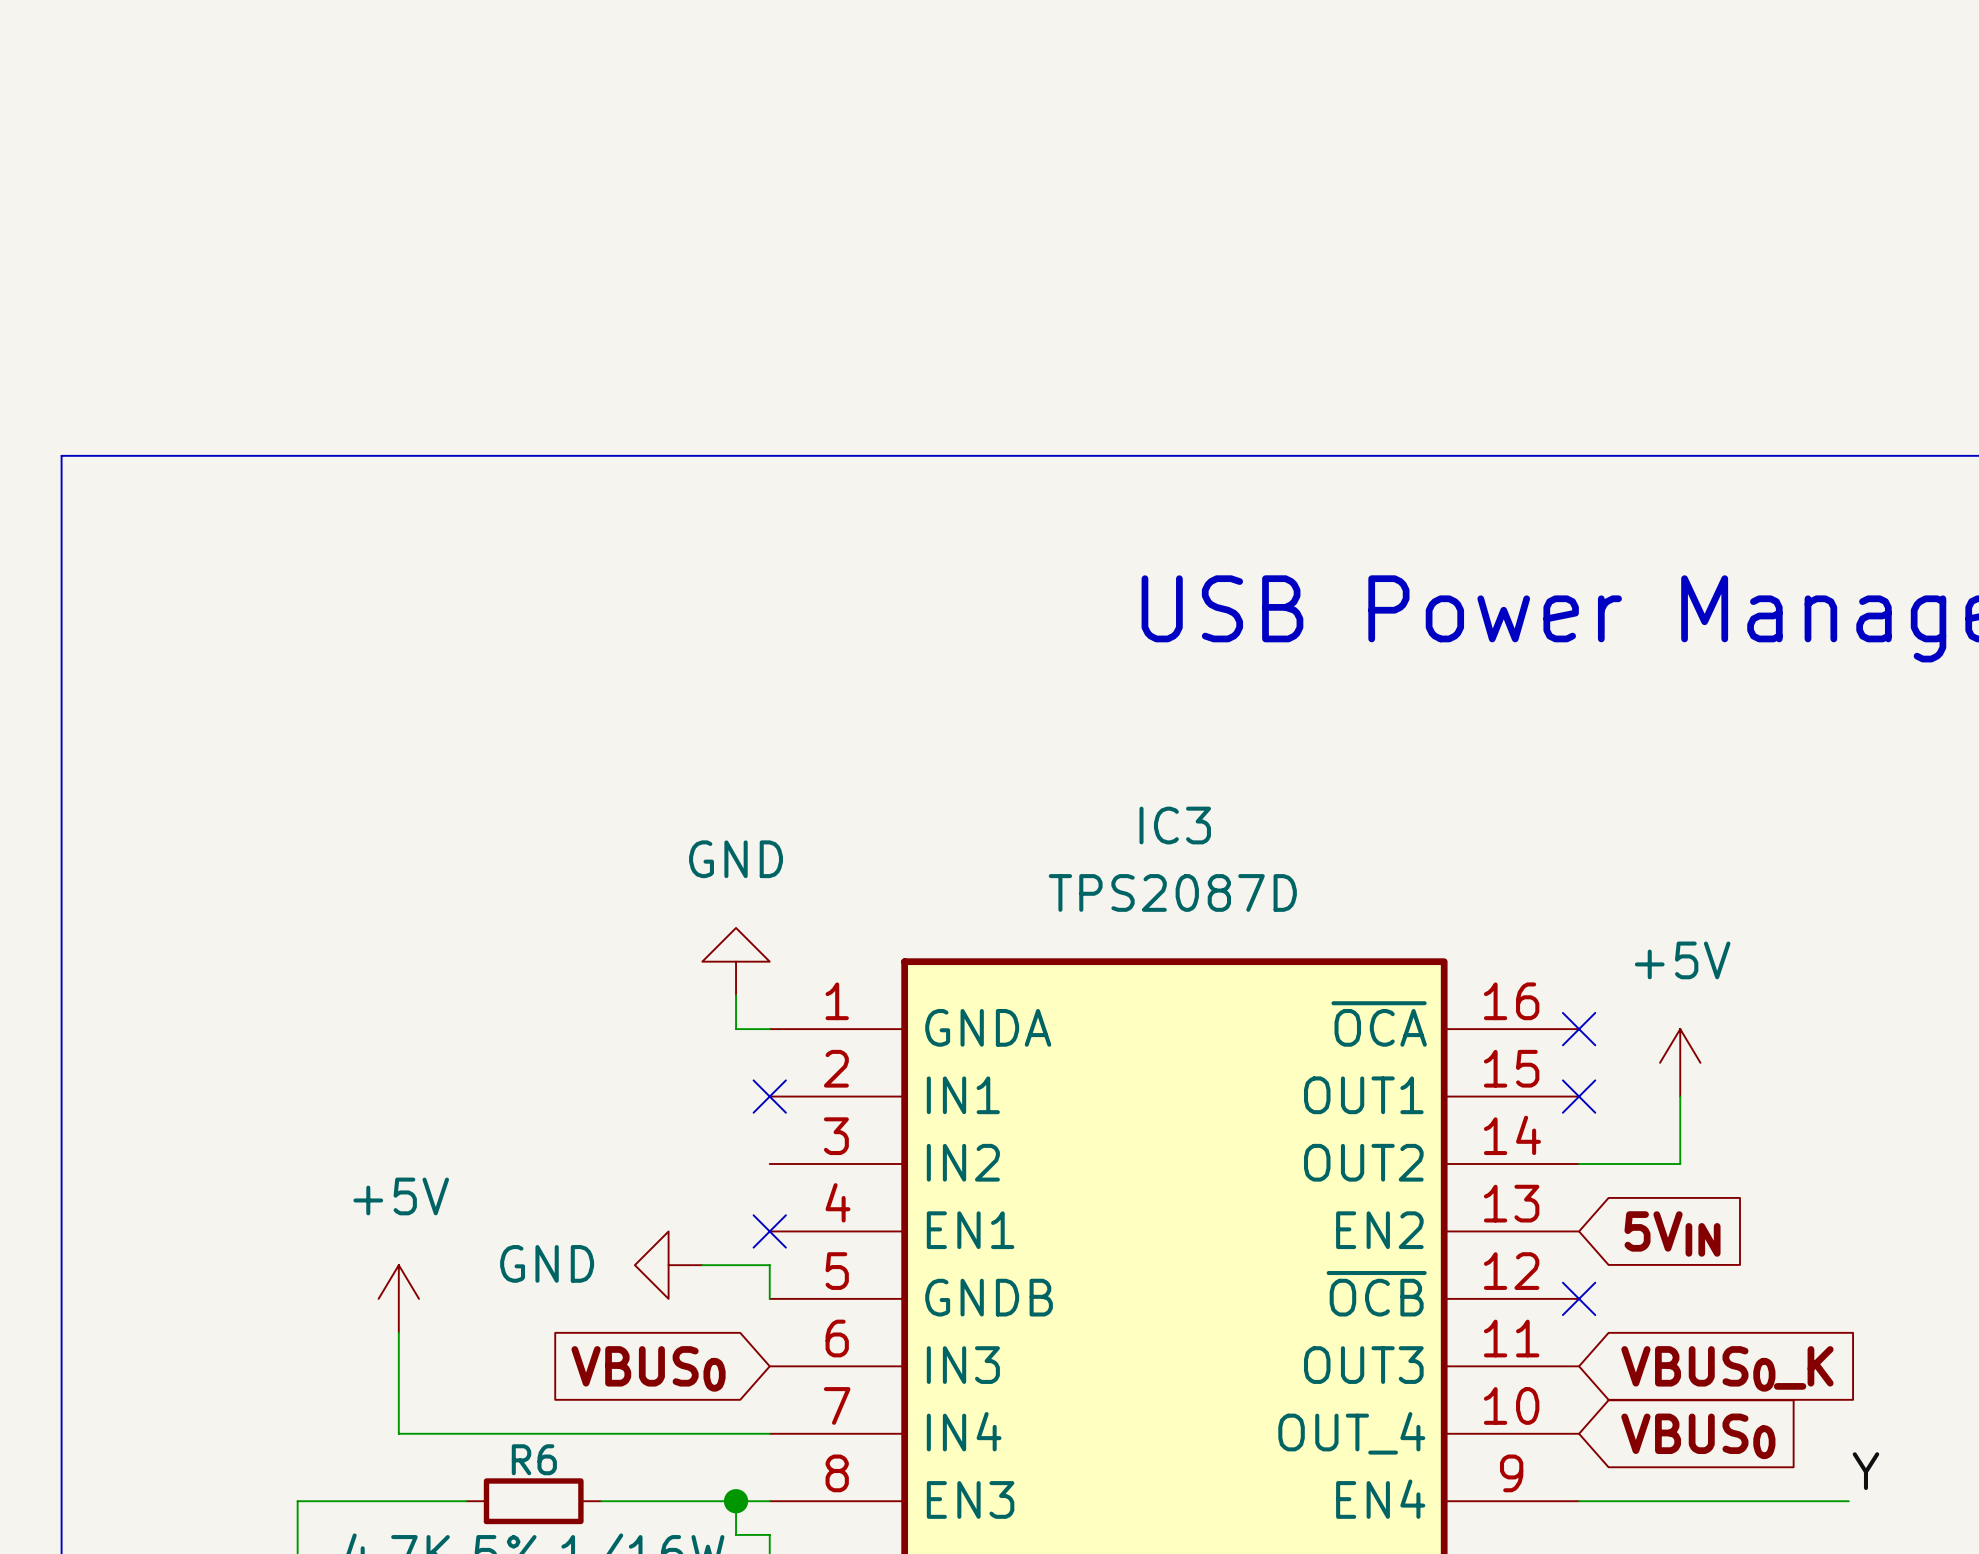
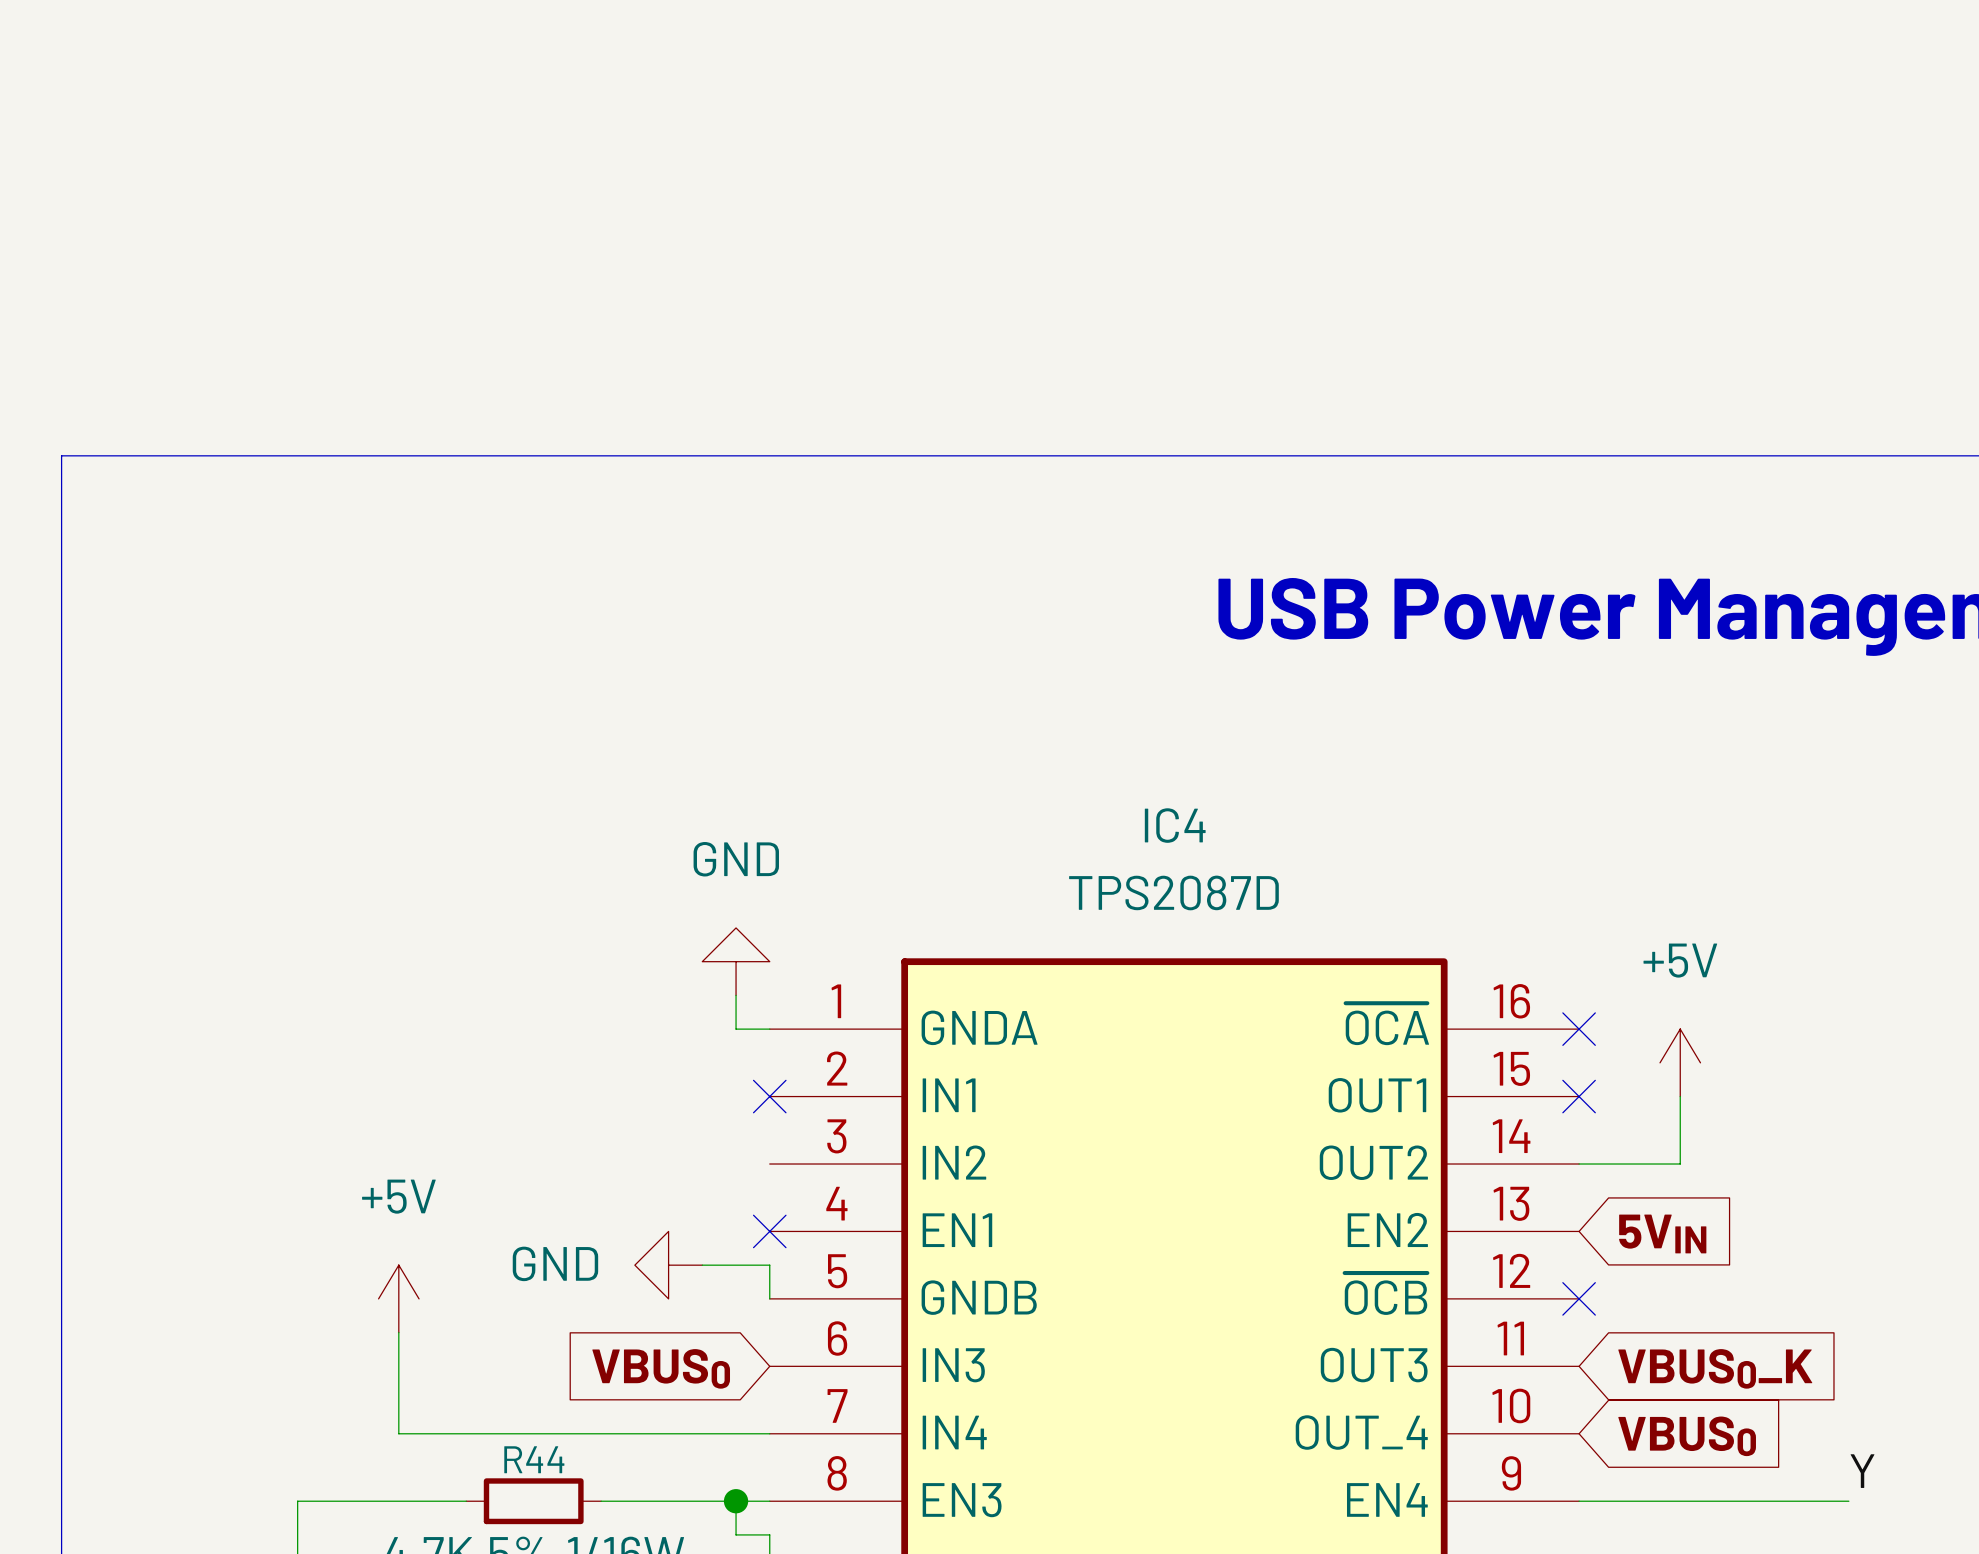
IC3 name: IC3 (1175, 825) -> IC4 (1175, 825)
R6 name: R6 (534, 1459) -> R44 (534, 1459)

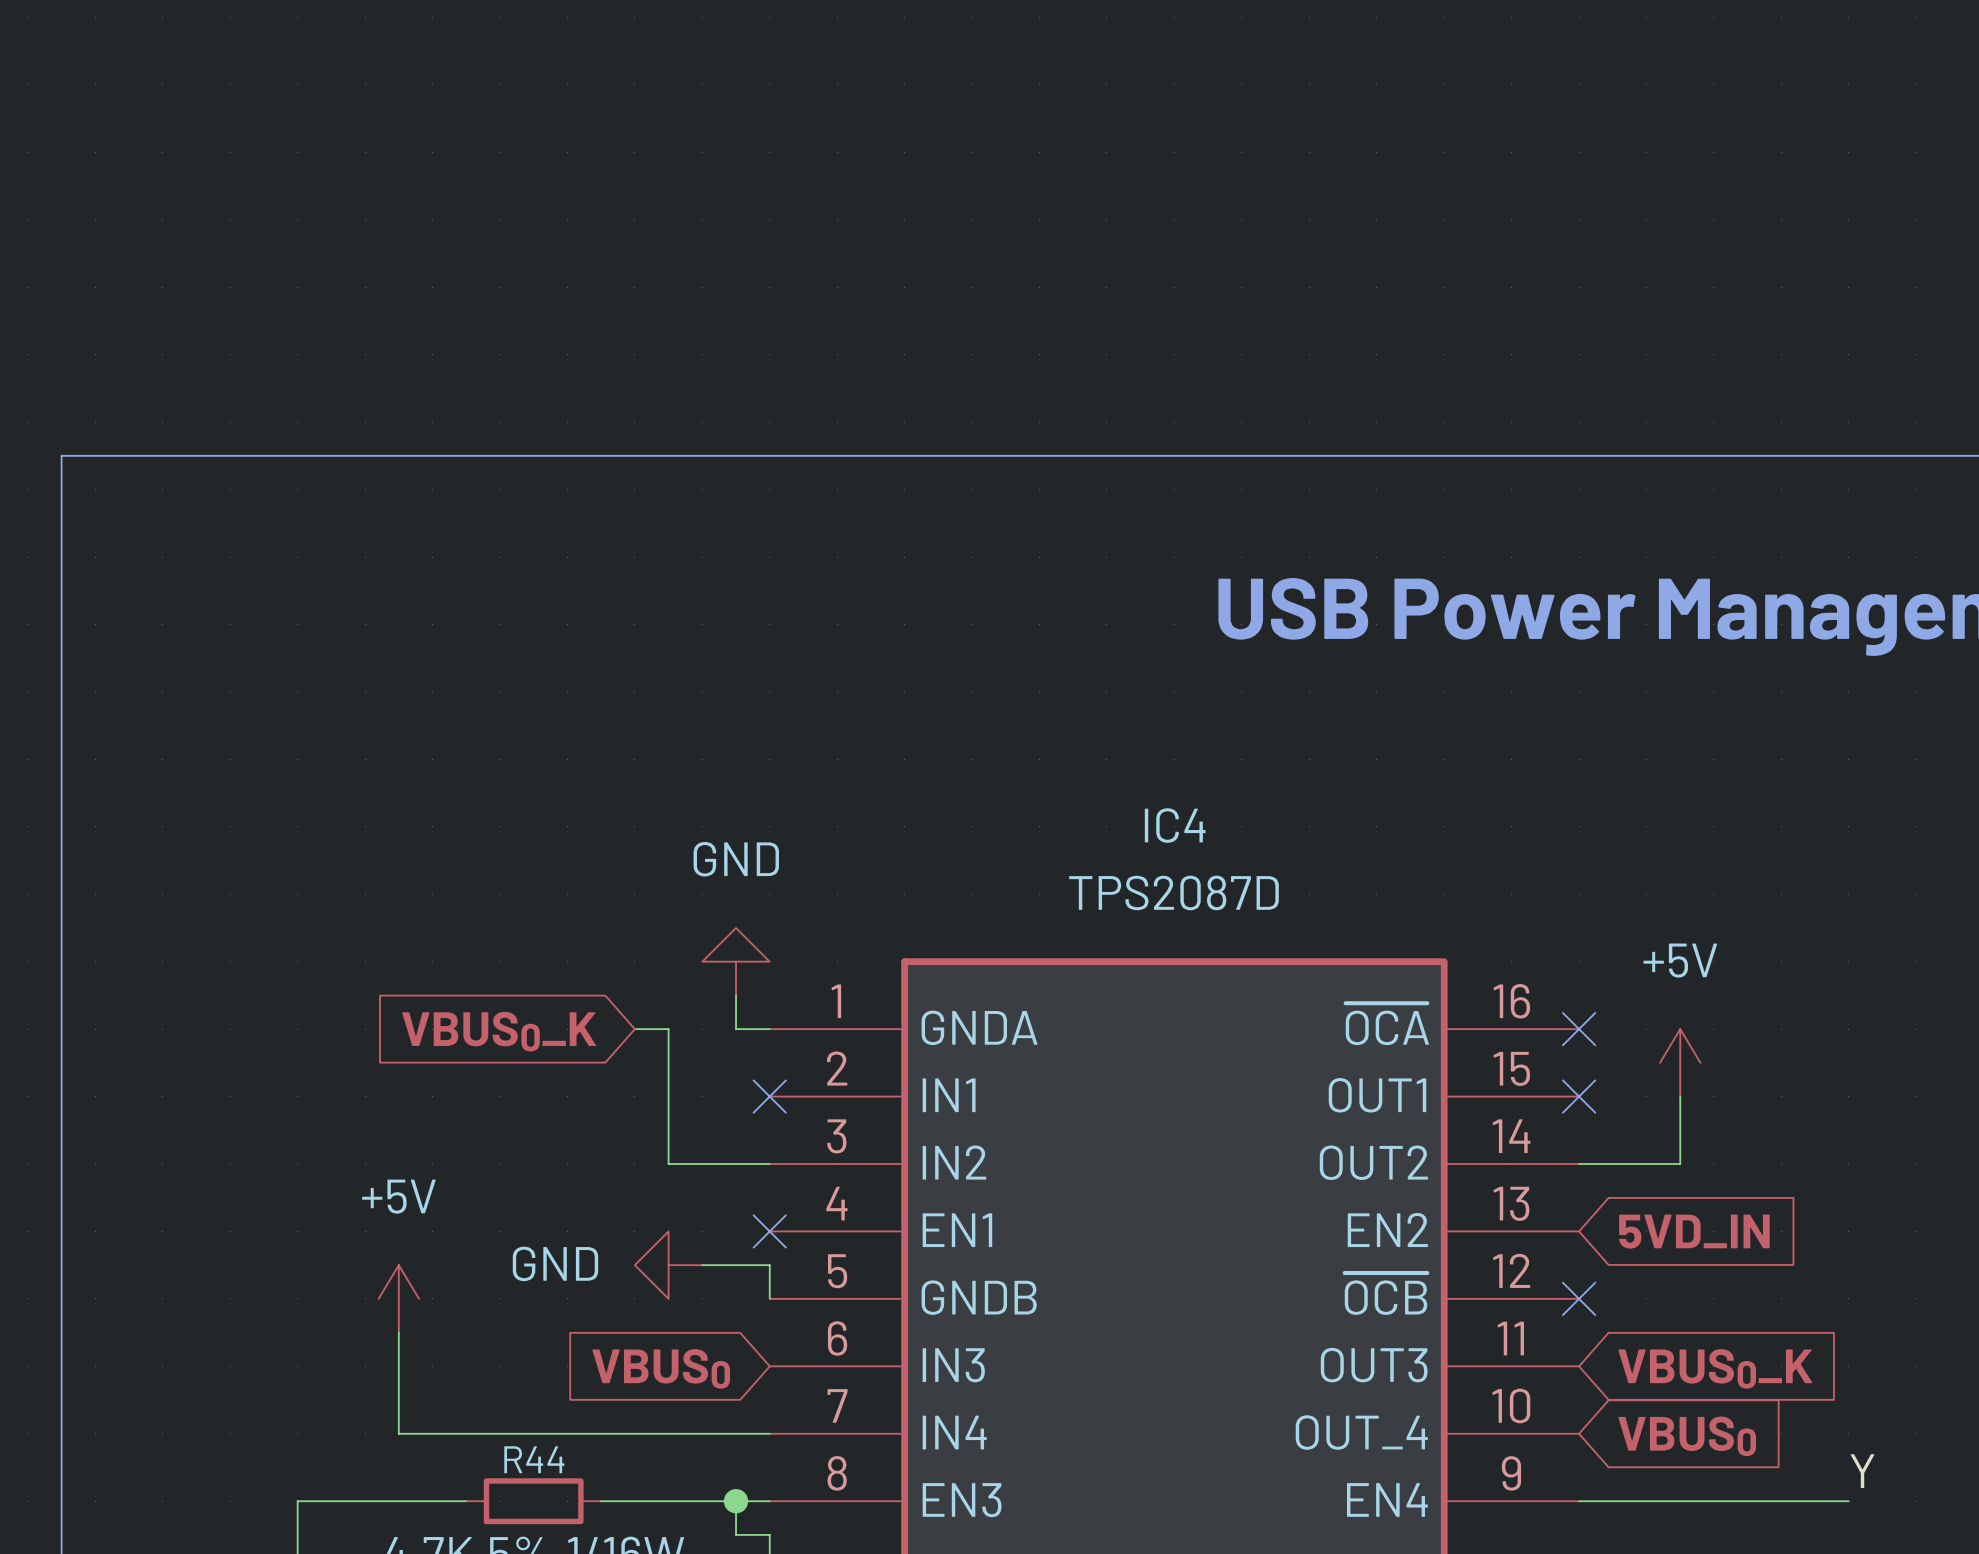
wire: none -> (634, 1029) (668, 1029) (668, 1164) (769, 1164)
global label: none -> VBUS0_K (499, 1031)
global label: 5VIN (1662, 1233) -> 5VD_IN (1694, 1231)

